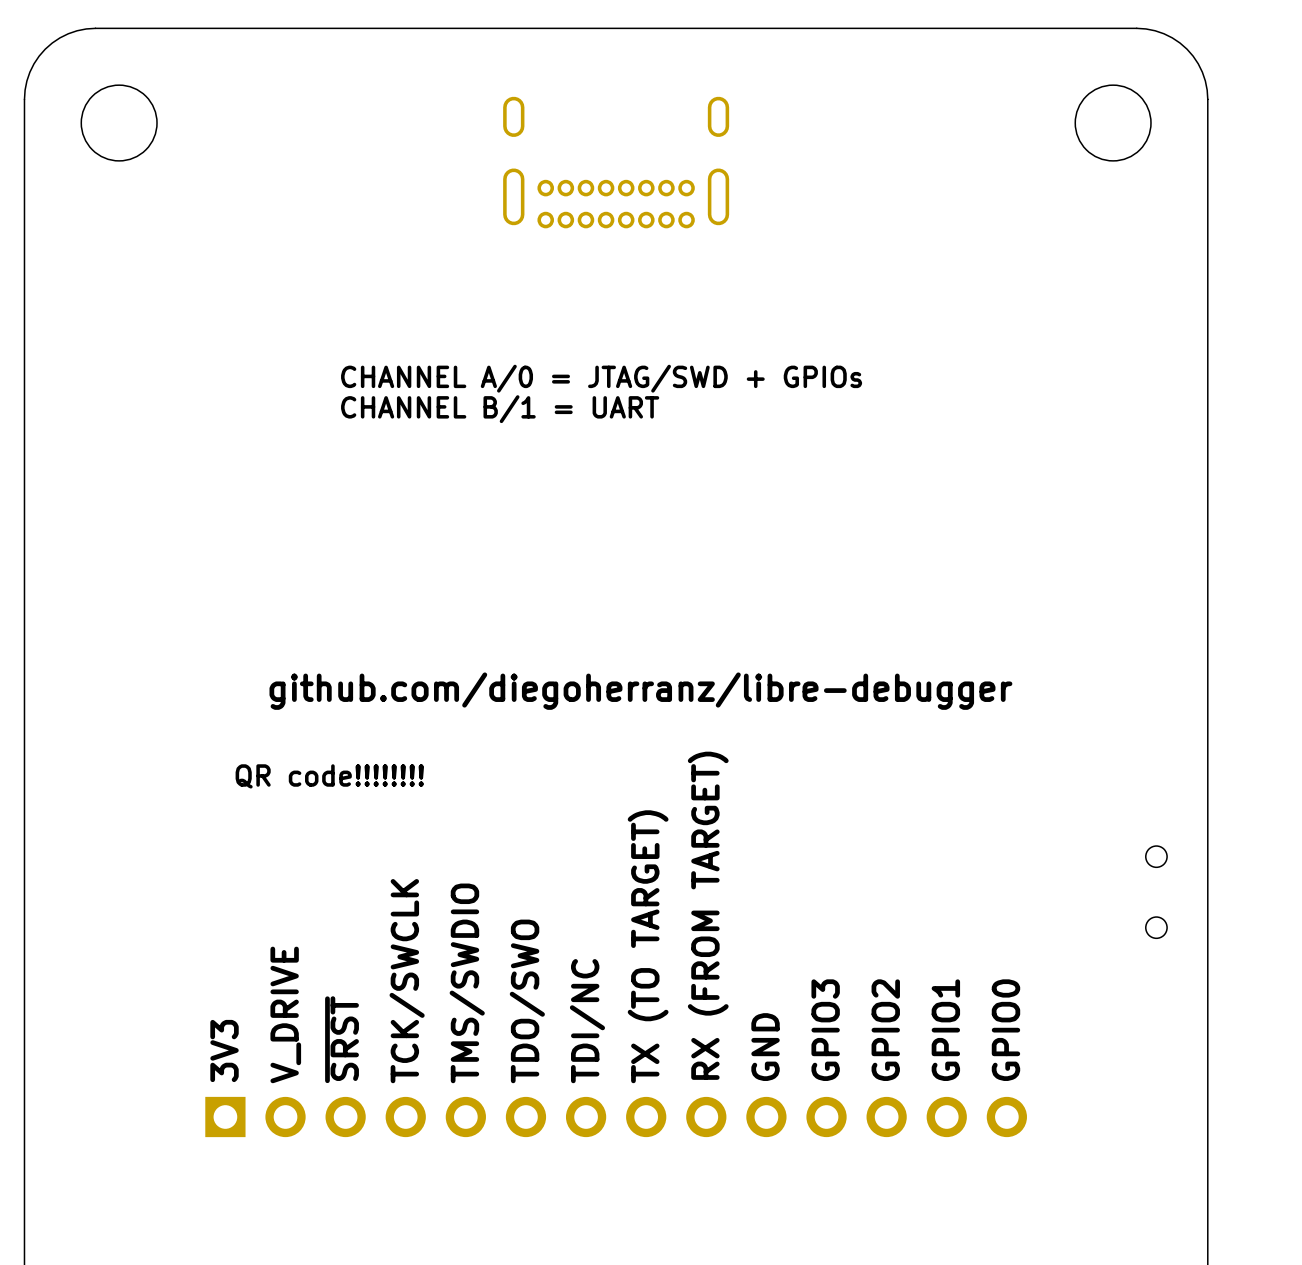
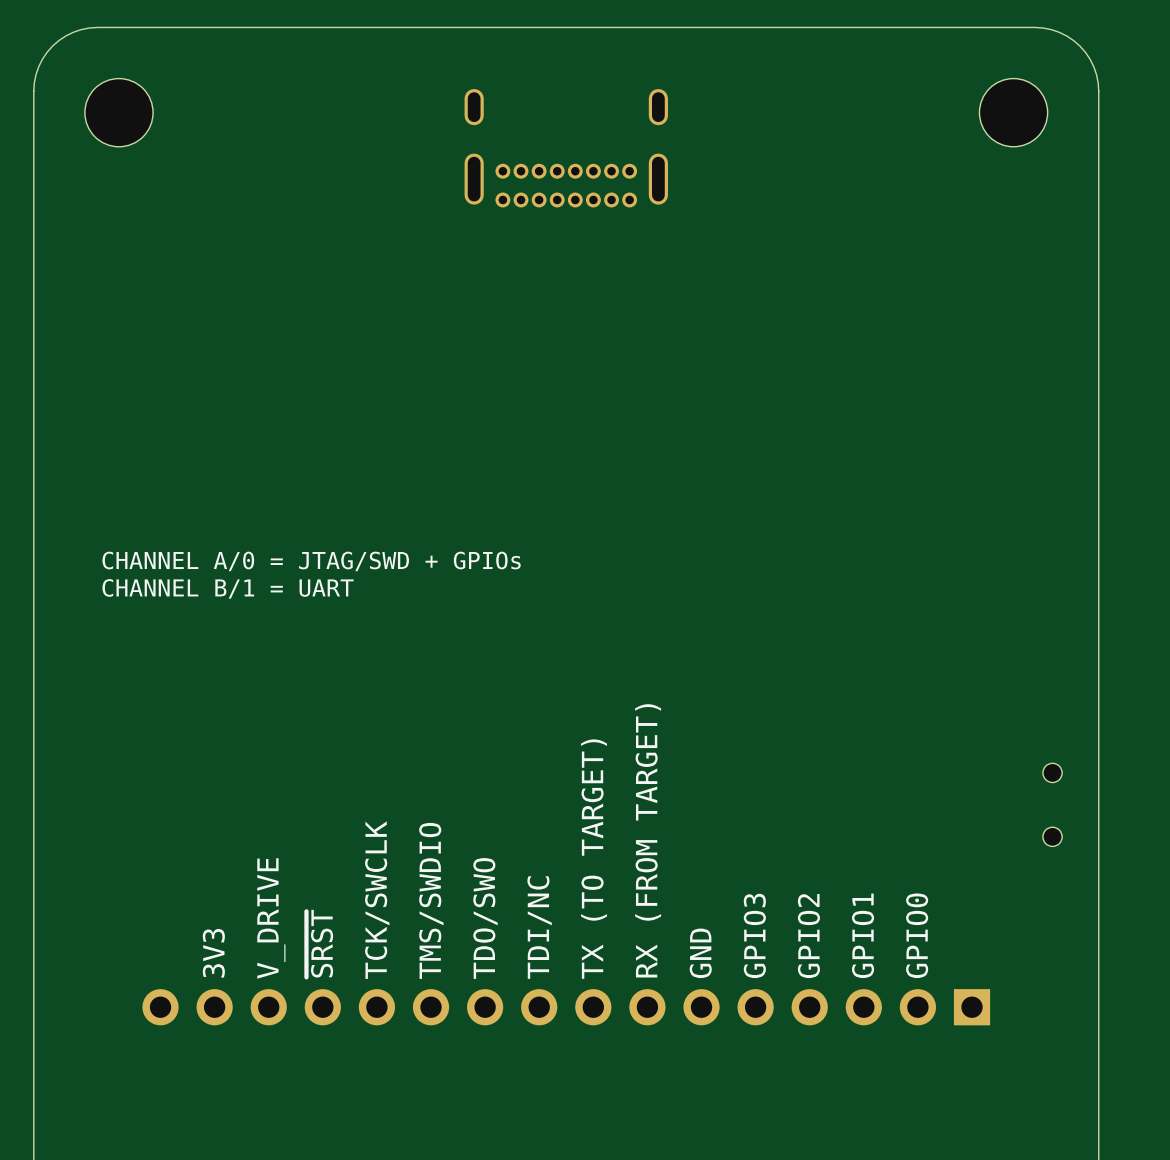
text position: CHANNEL A/0 = JTAG/SWD + GPIOs (601, 378) -> CHANNEL A/0 = JTAG/SWD + GPIOs (311, 561)
text position: CHANNEL B/1 = UART (500, 409) -> CHANNEL B/1 = UART (228, 588)
text: github.com/diegoherranz/libre-debugger (640, 691) -> none
text: QR code!!!!!!!! (329, 776) -> none
part footprint: [205, 1096, 1027, 1138] -> [142, 989, 991, 1026]

